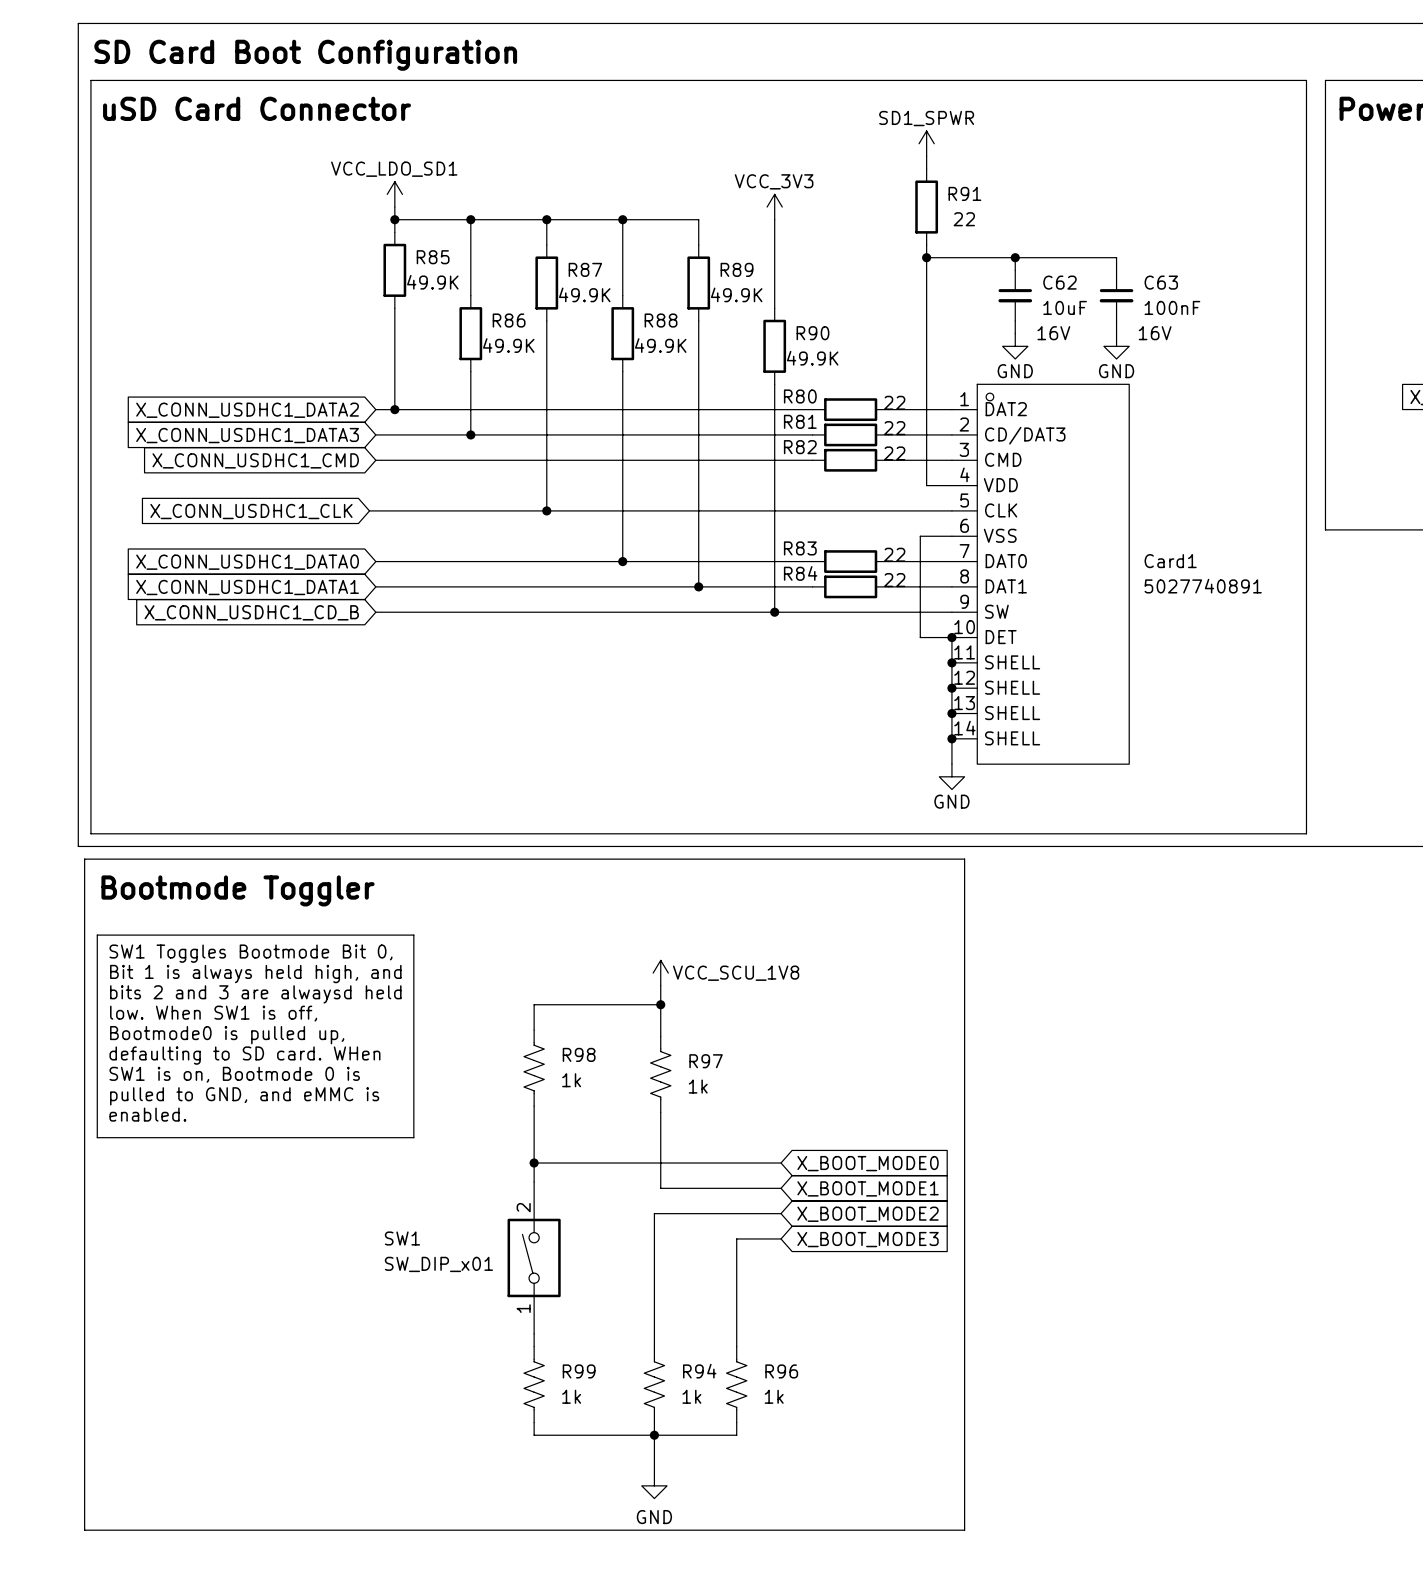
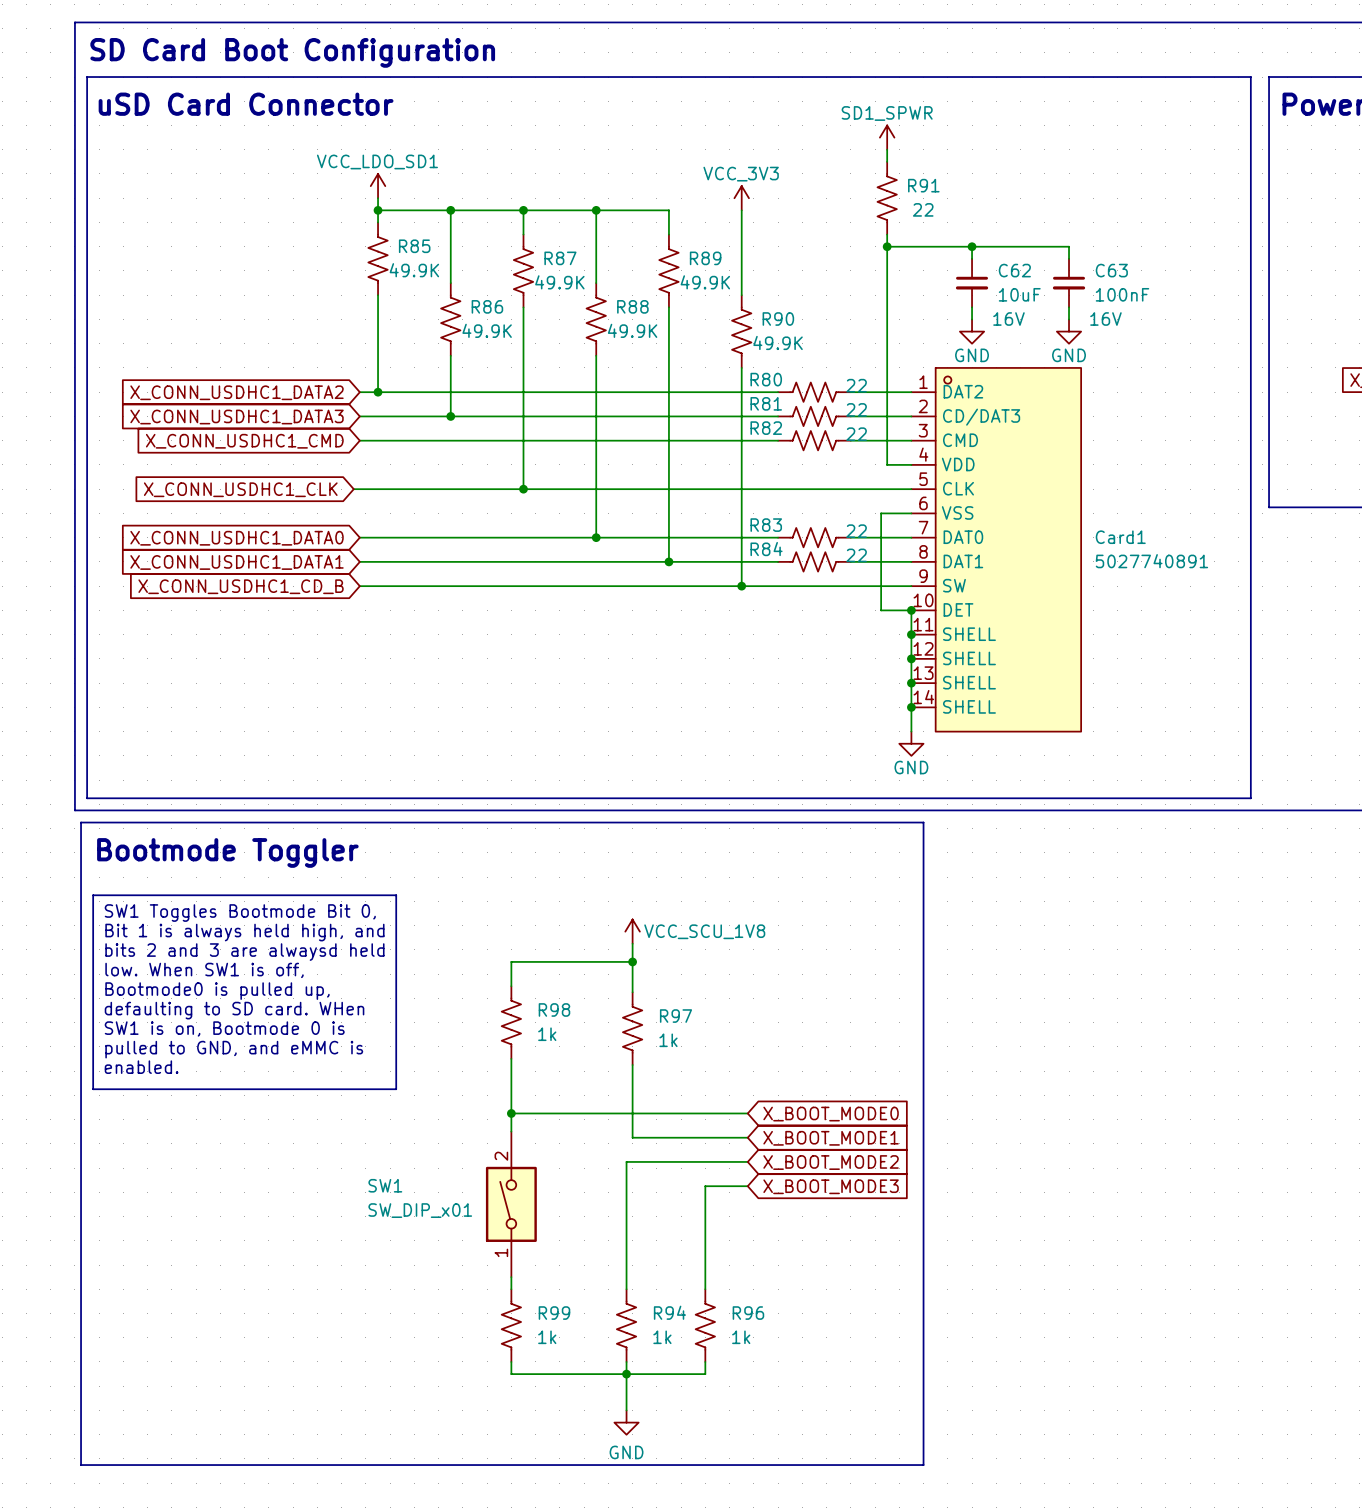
R91 symbol: [915, 169, 939, 246] -> [877, 161, 897, 235]
R85 symbol: [383, 232, 407, 309] -> [368, 222, 388, 296]
R87 symbol: [535, 245, 559, 322] -> [513, 234, 534, 308]
R89 symbol: [687, 245, 711, 322] -> [659, 234, 679, 308]
R86 symbol: [459, 295, 483, 372] -> [441, 283, 461, 356]
R88 symbol: [611, 295, 635, 372] -> [586, 283, 606, 356]
R90 symbol: [763, 308, 787, 385] -> [732, 295, 752, 368]
R80 symbol: [812, 398, 889, 422] -> [778, 382, 851, 402]
R81 symbol: [812, 423, 889, 447] -> [778, 406, 851, 427]
R82 symbol: [812, 448, 889, 472] -> [778, 430, 851, 451]
R83 symbol: [812, 550, 889, 573] -> [778, 527, 851, 548]
R84 symbol: [812, 575, 889, 599] -> [778, 552, 851, 572]

